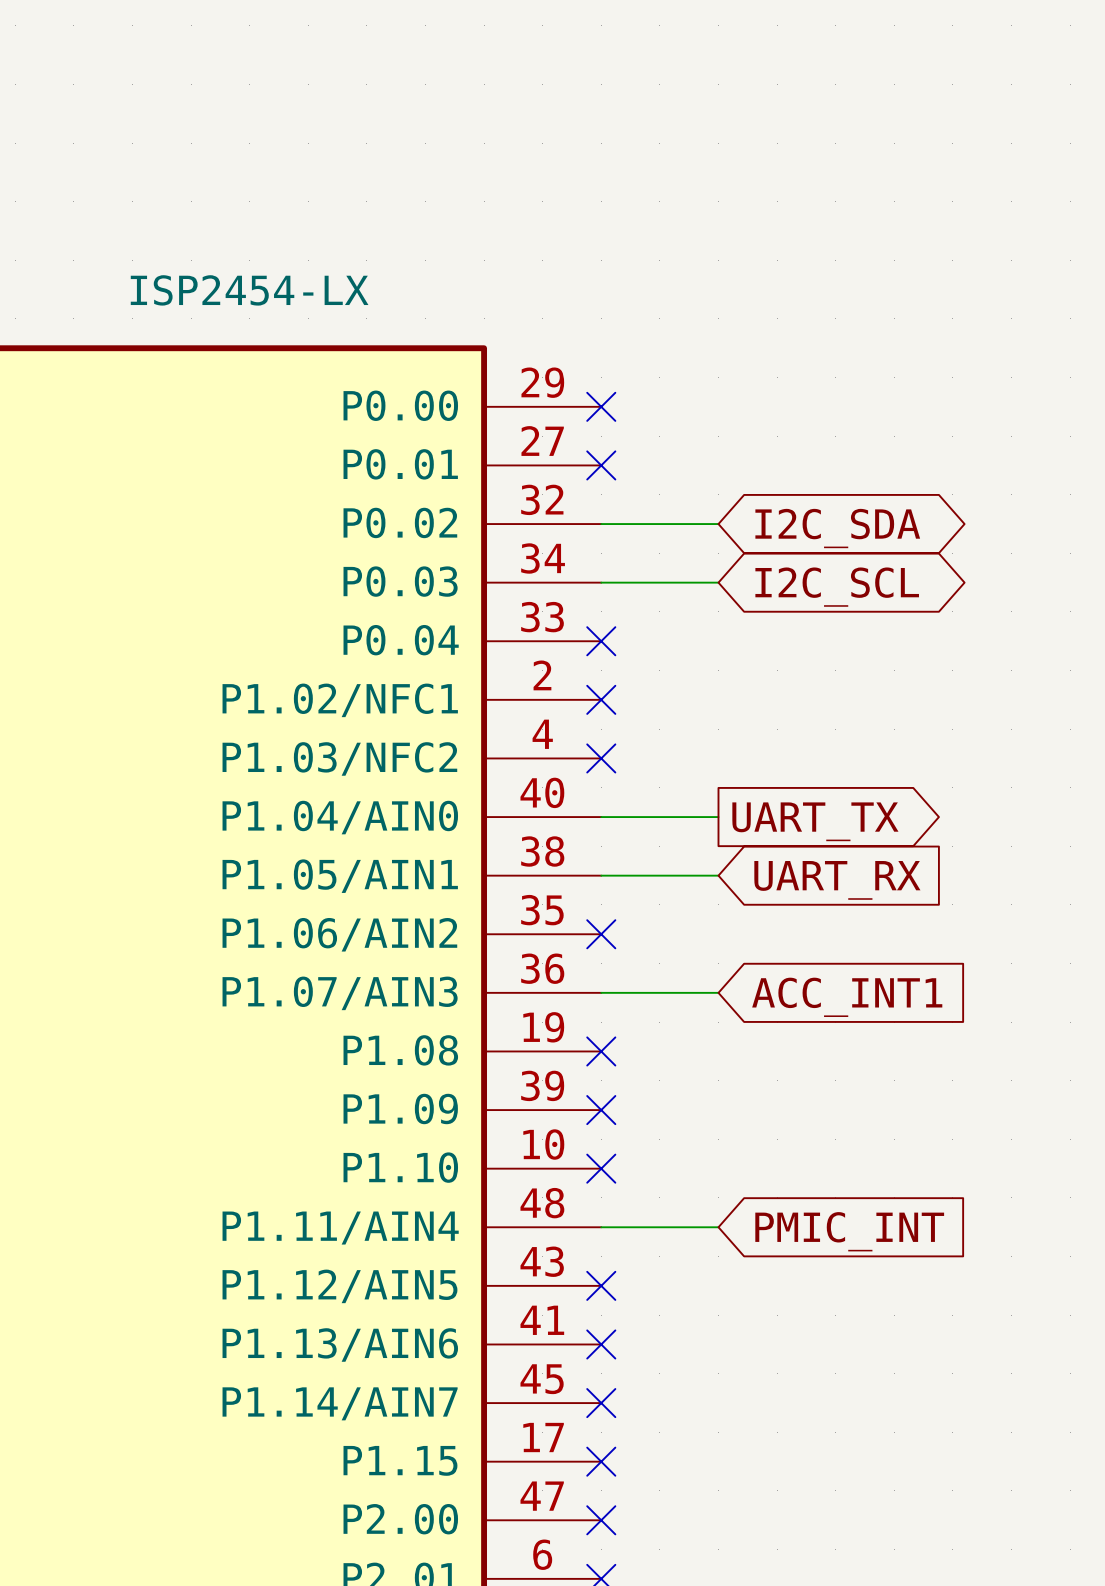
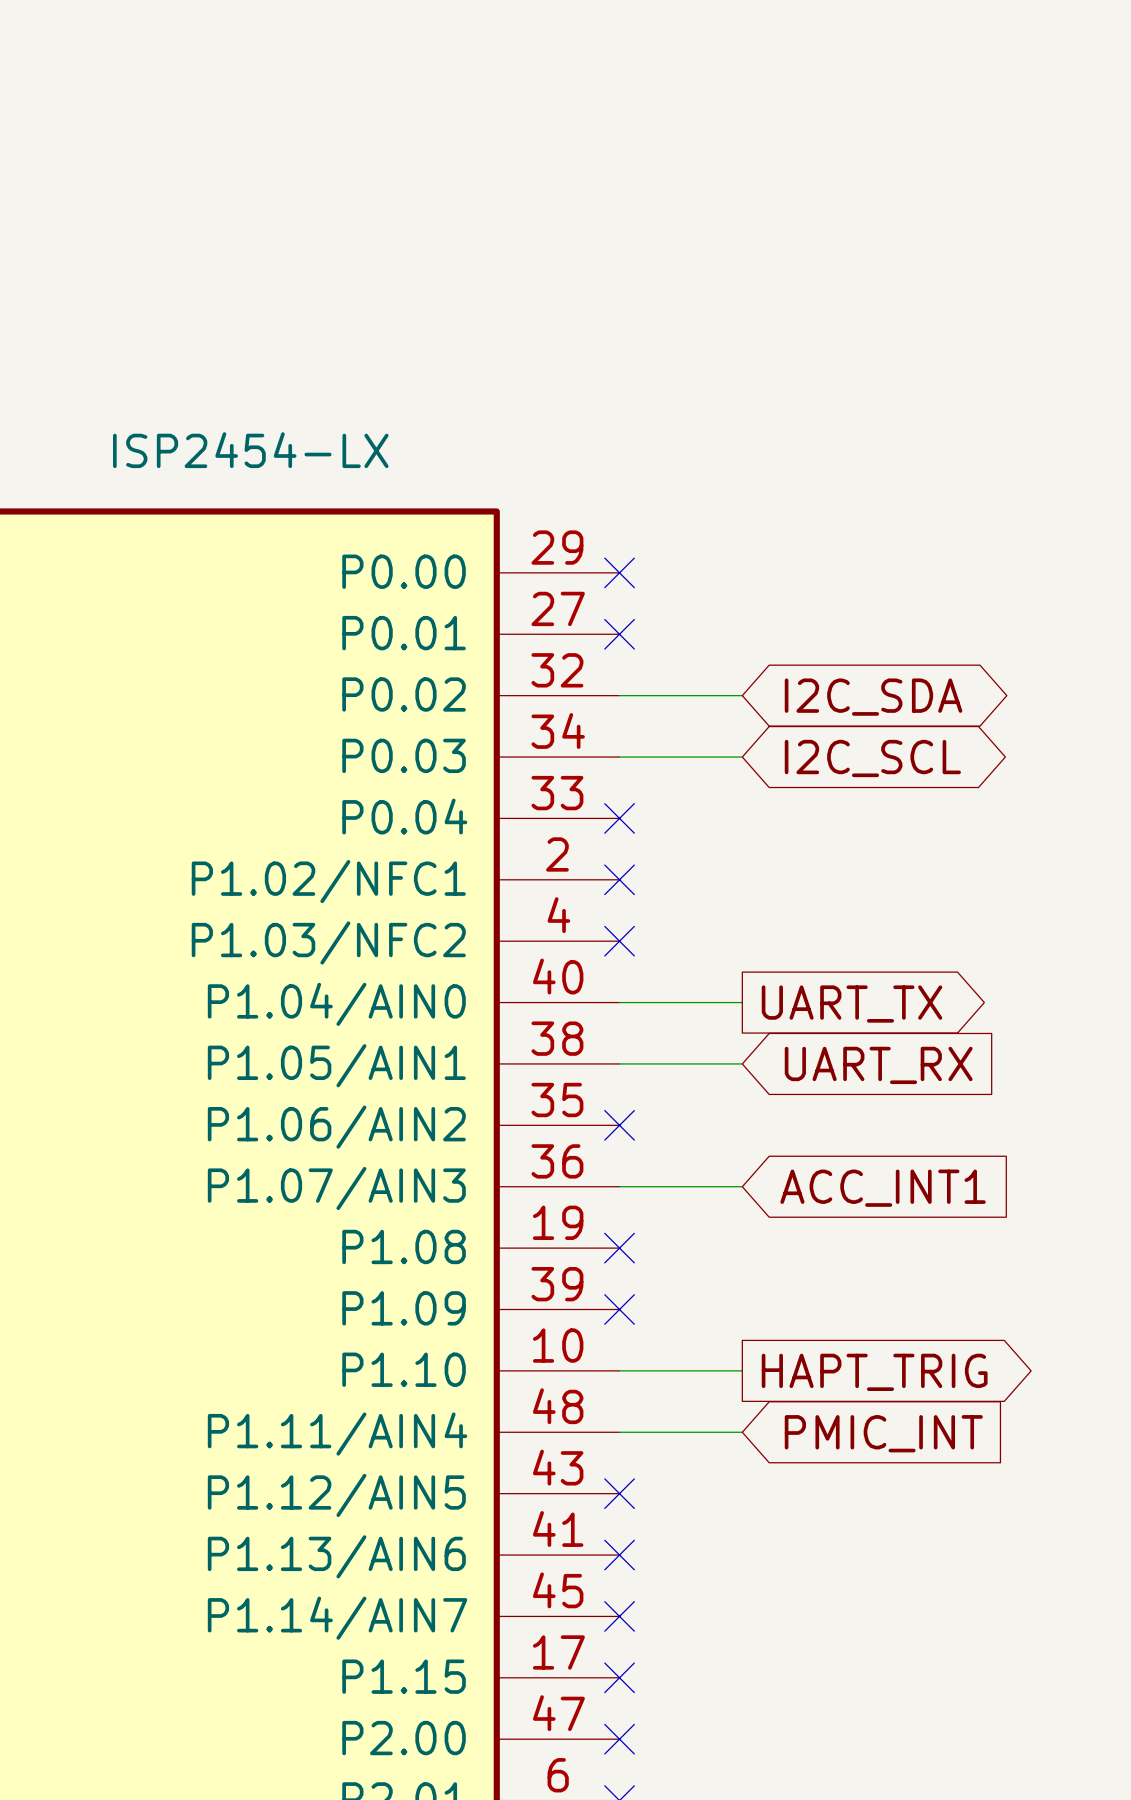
wire: none -> (619, 1370) (742, 1370)
no-connect mark: (601, 1168) -> none
global label: none -> HAPT_TRIG (874, 1372)

